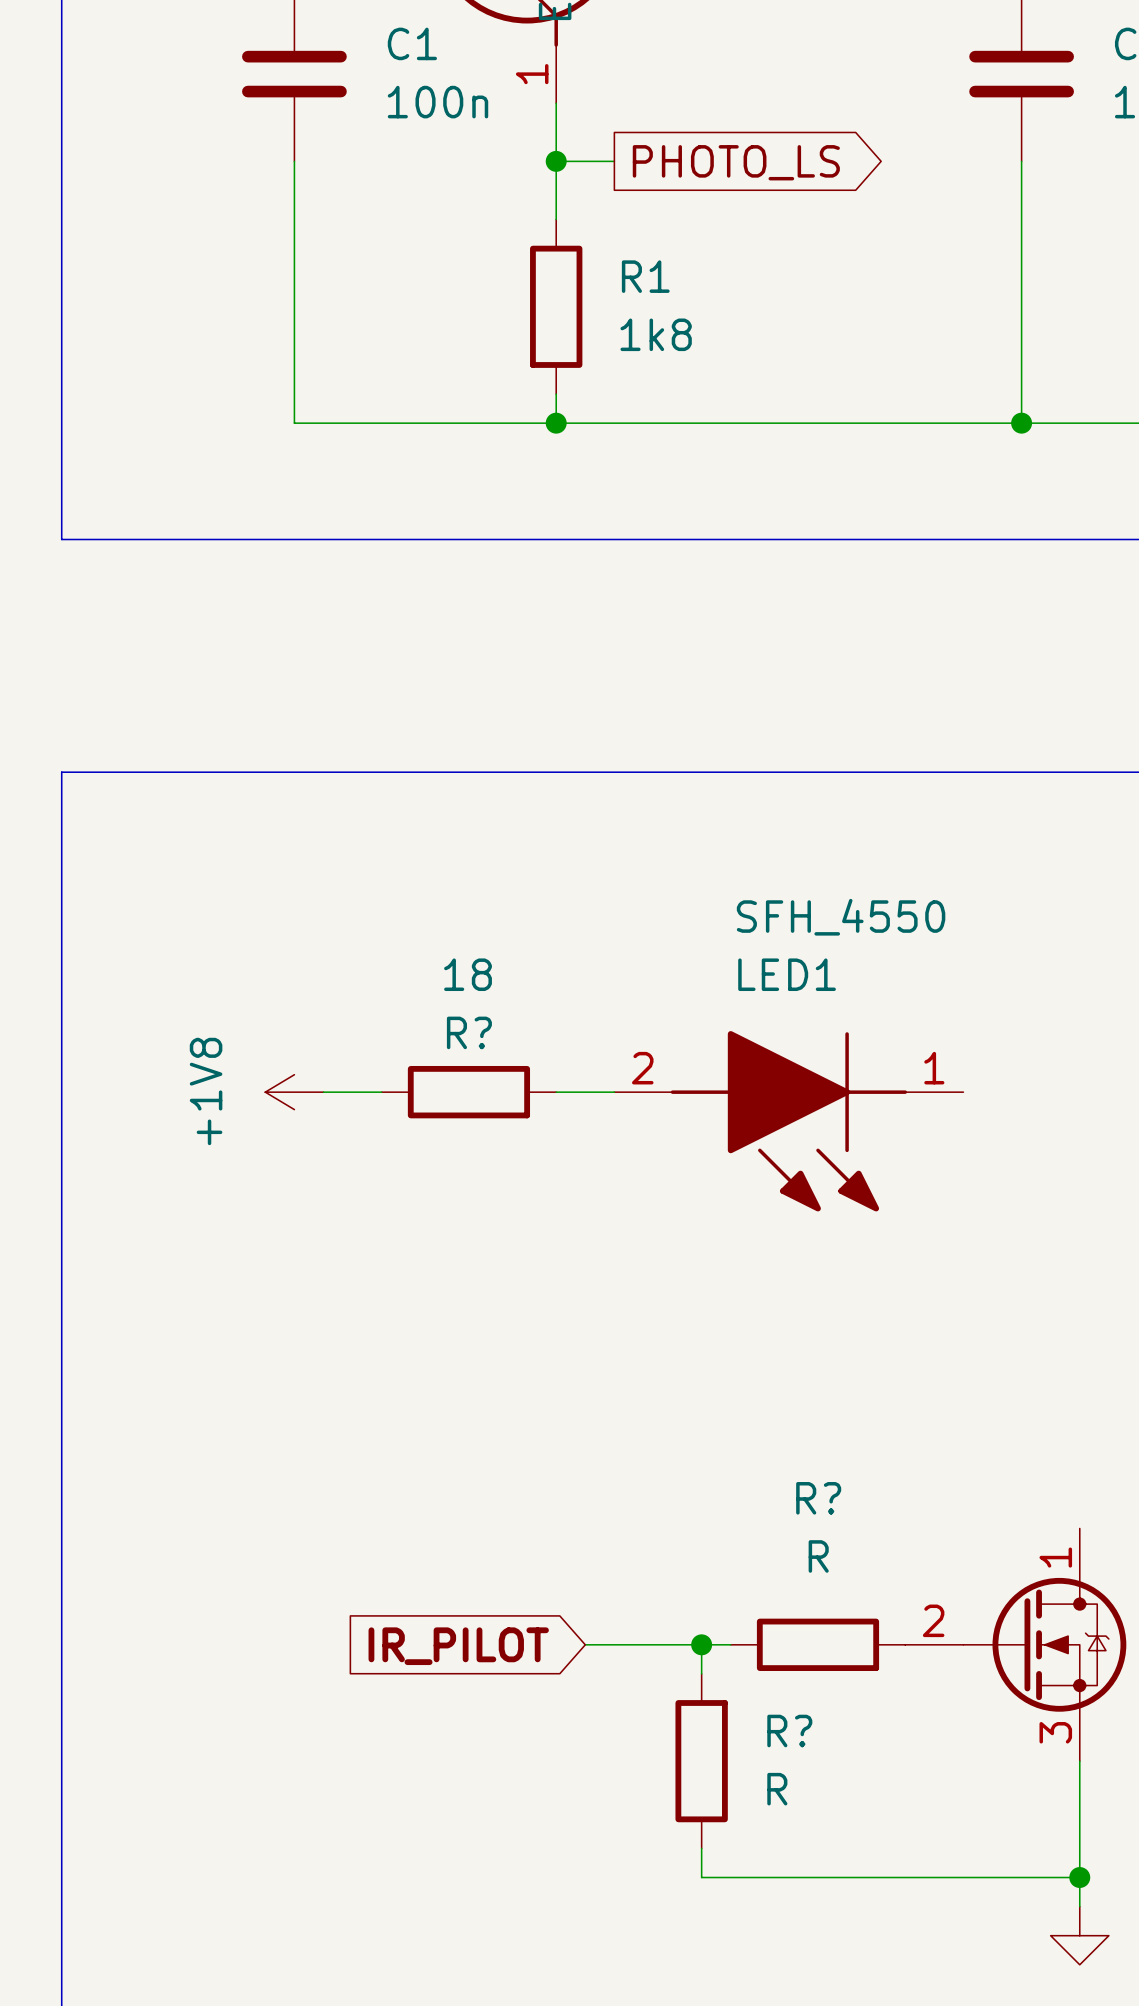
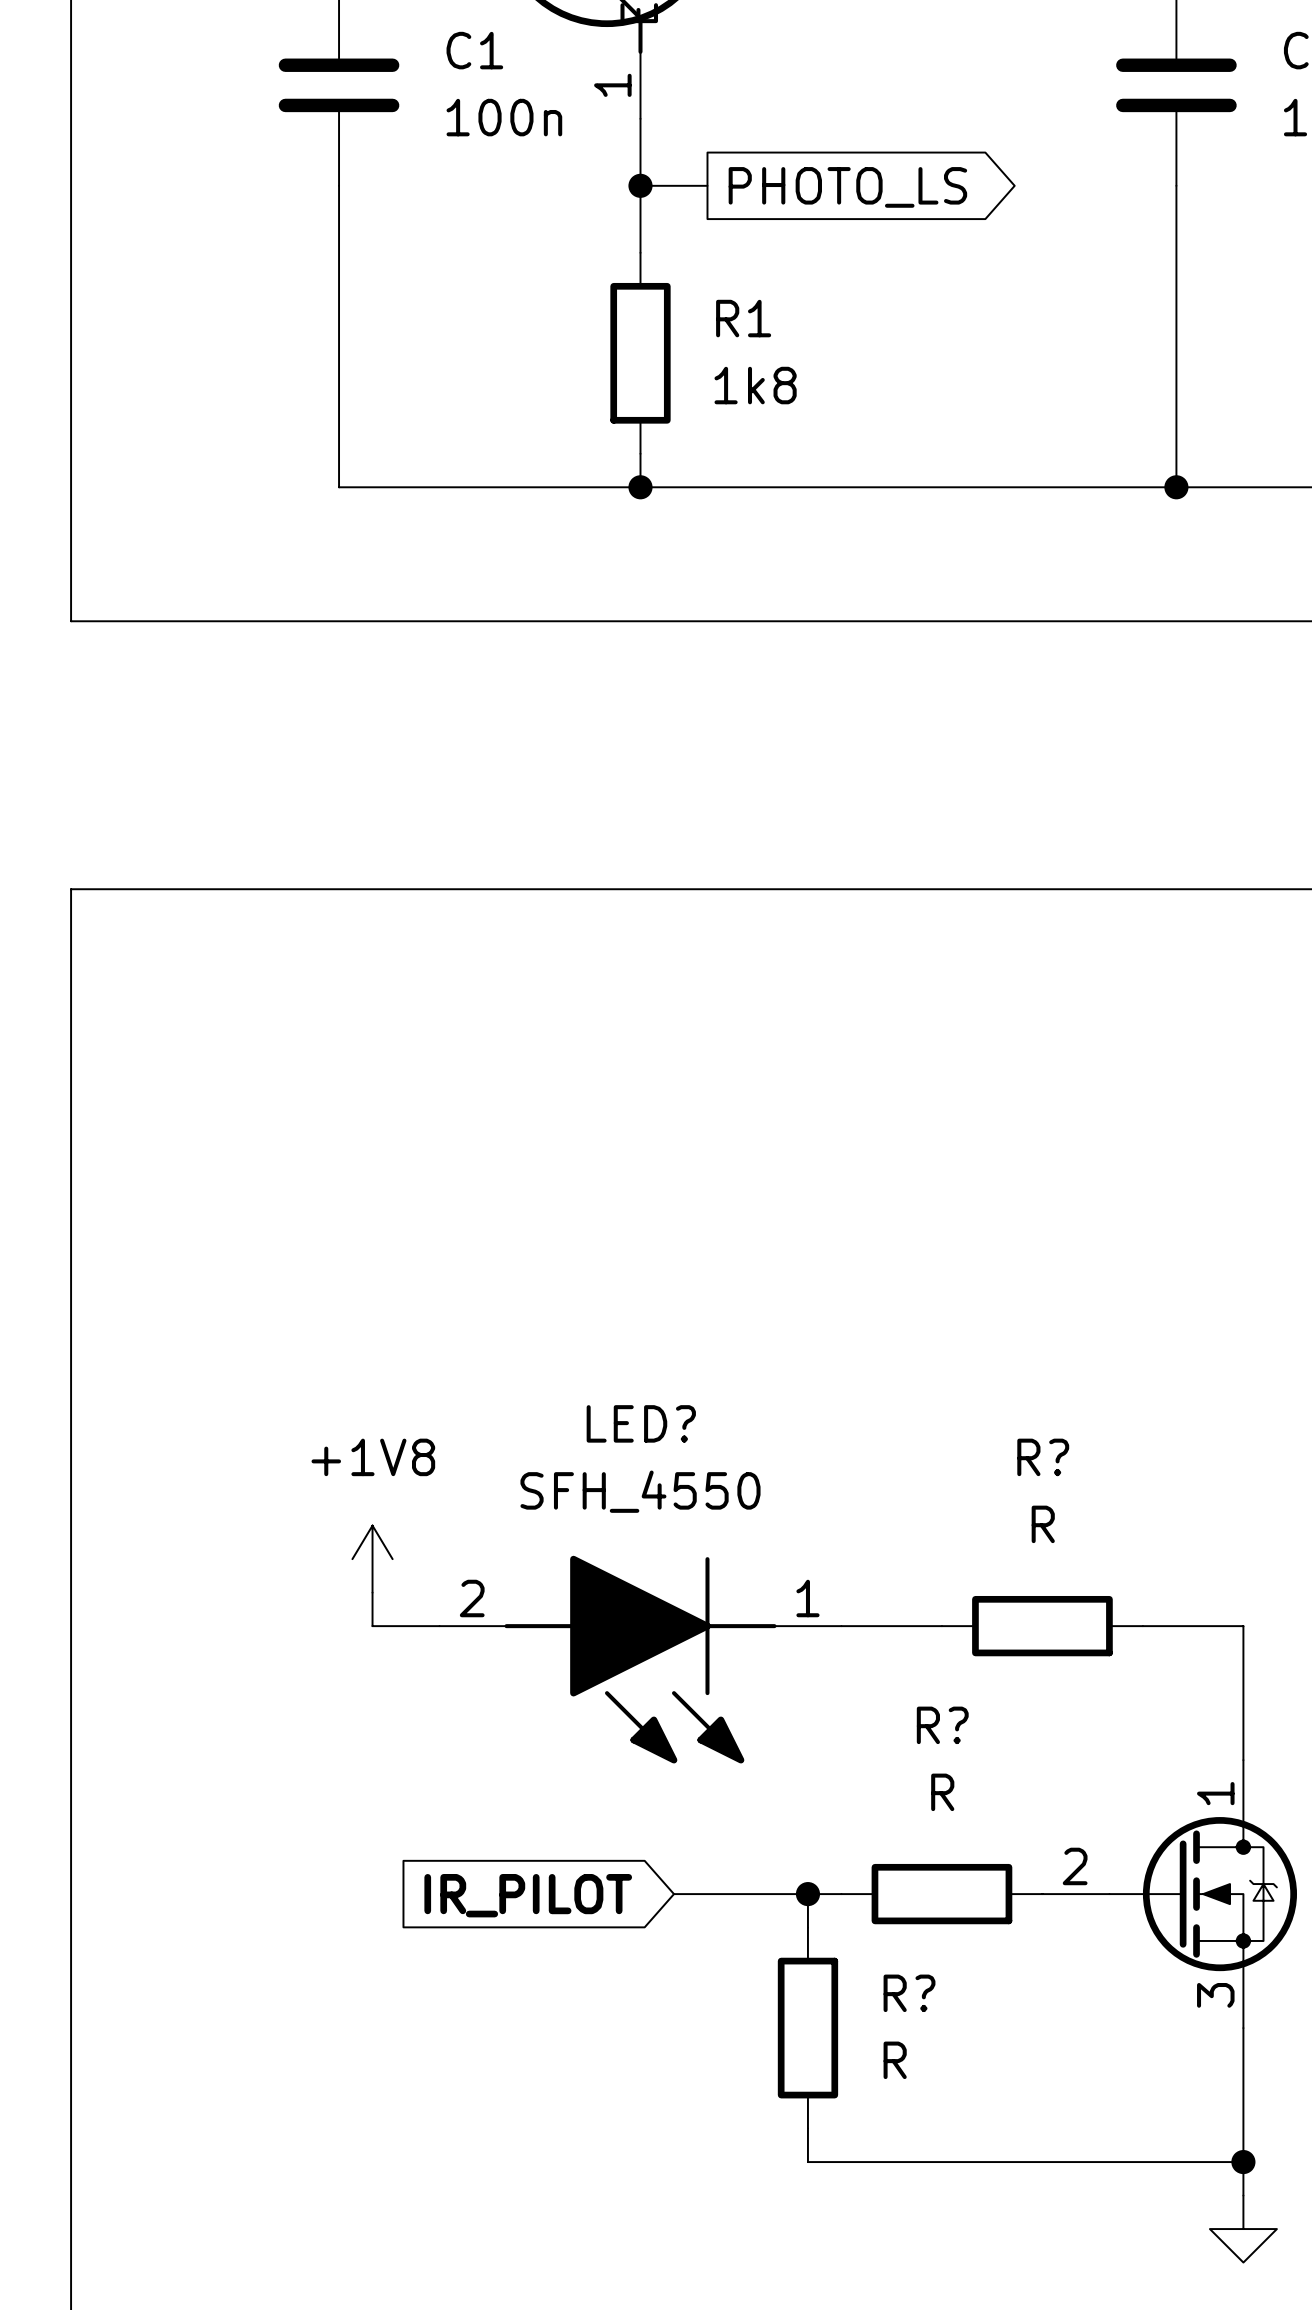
power symbol rotation: 0° (294, 1092) -> 90° clockwise (372, 1559)
power symbol position: +1V8 (294, 1092) -> +1V8 (372, 1559)
wire: (323, 1092) (381, 1092) -> none
R?: 18 (468, 1092) -> none
wire: (556, 1092) (614, 1092) -> none
LED1: SFH_4550 (788, 1121) -> none
wire: none -> (372, 1592) (372, 1626) (439, 1626)
wire: none -> (841, 1626) (941, 1626)
R?: none -> R (1042, 1626)
wire: none -> (1142, 1626) (1243, 1626) (1243, 1760)
LED?: none -> SFH_4550 (640, 1659)

